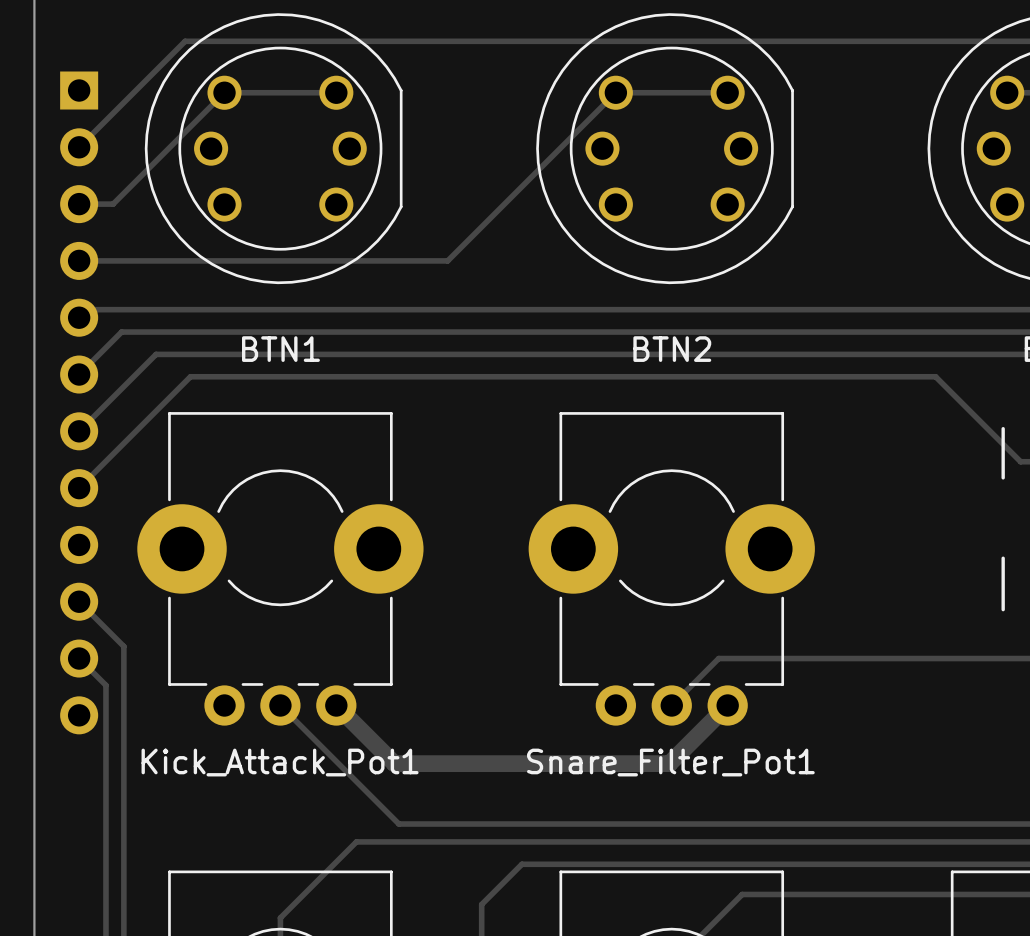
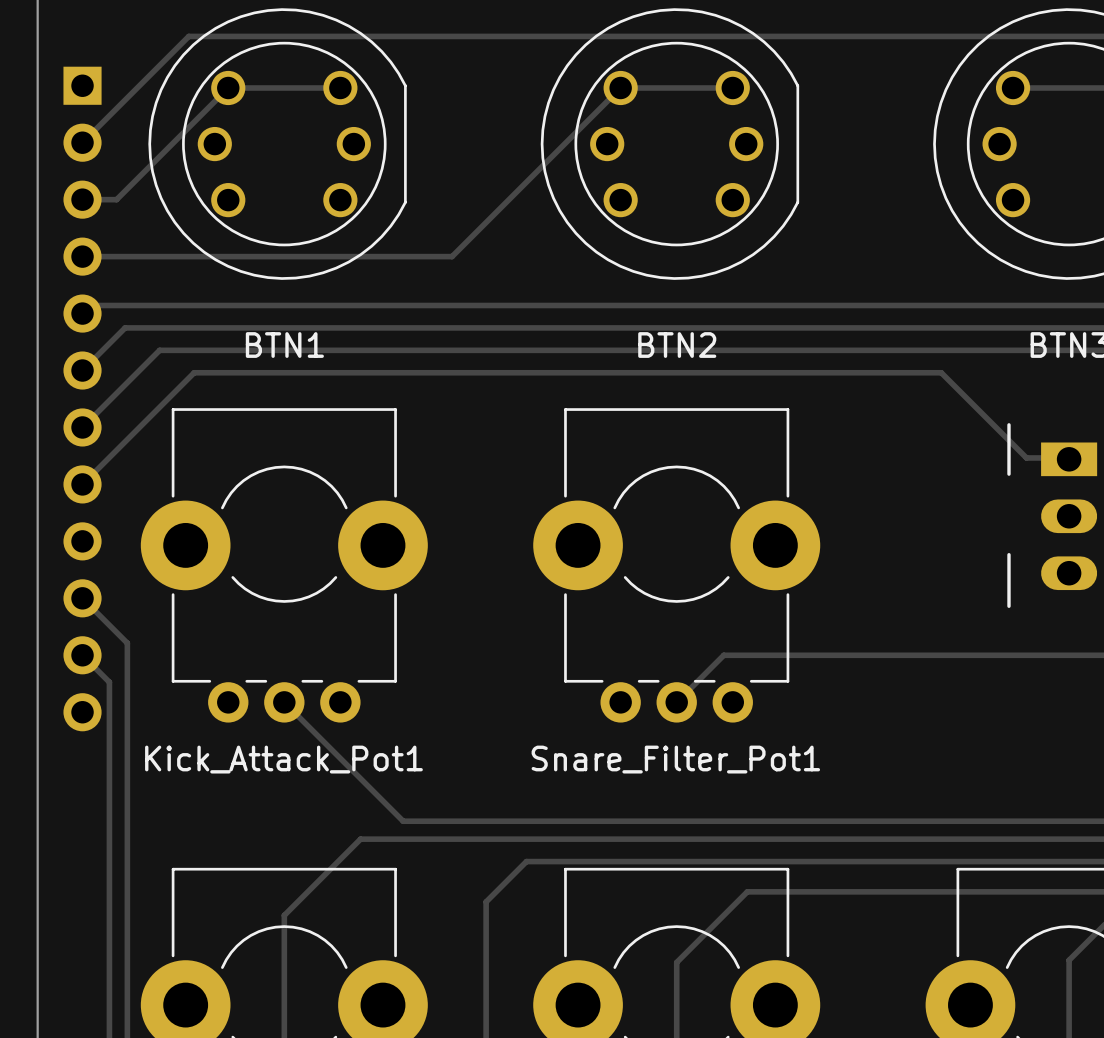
track: (336, 705) (394, 763) (669, 763) (727, 705) -> none

